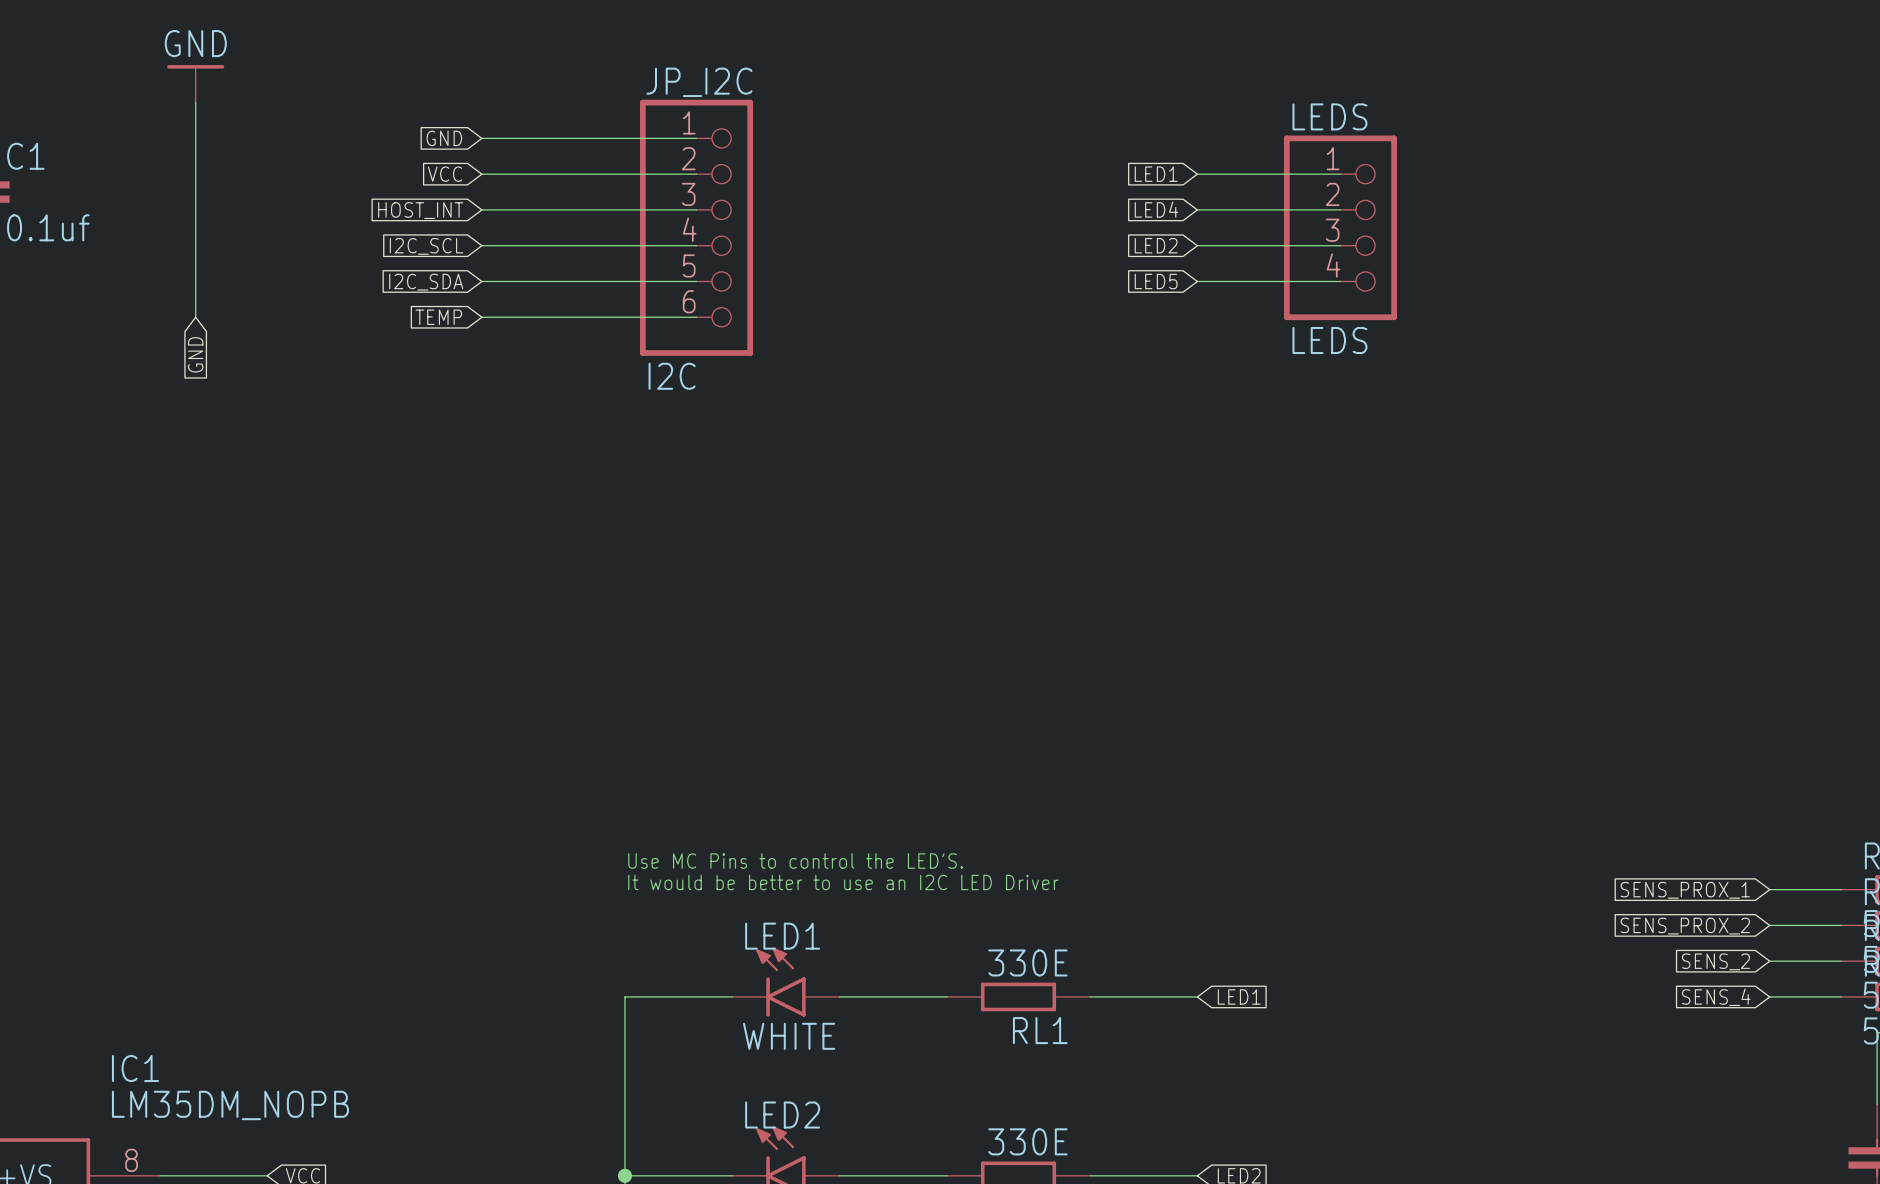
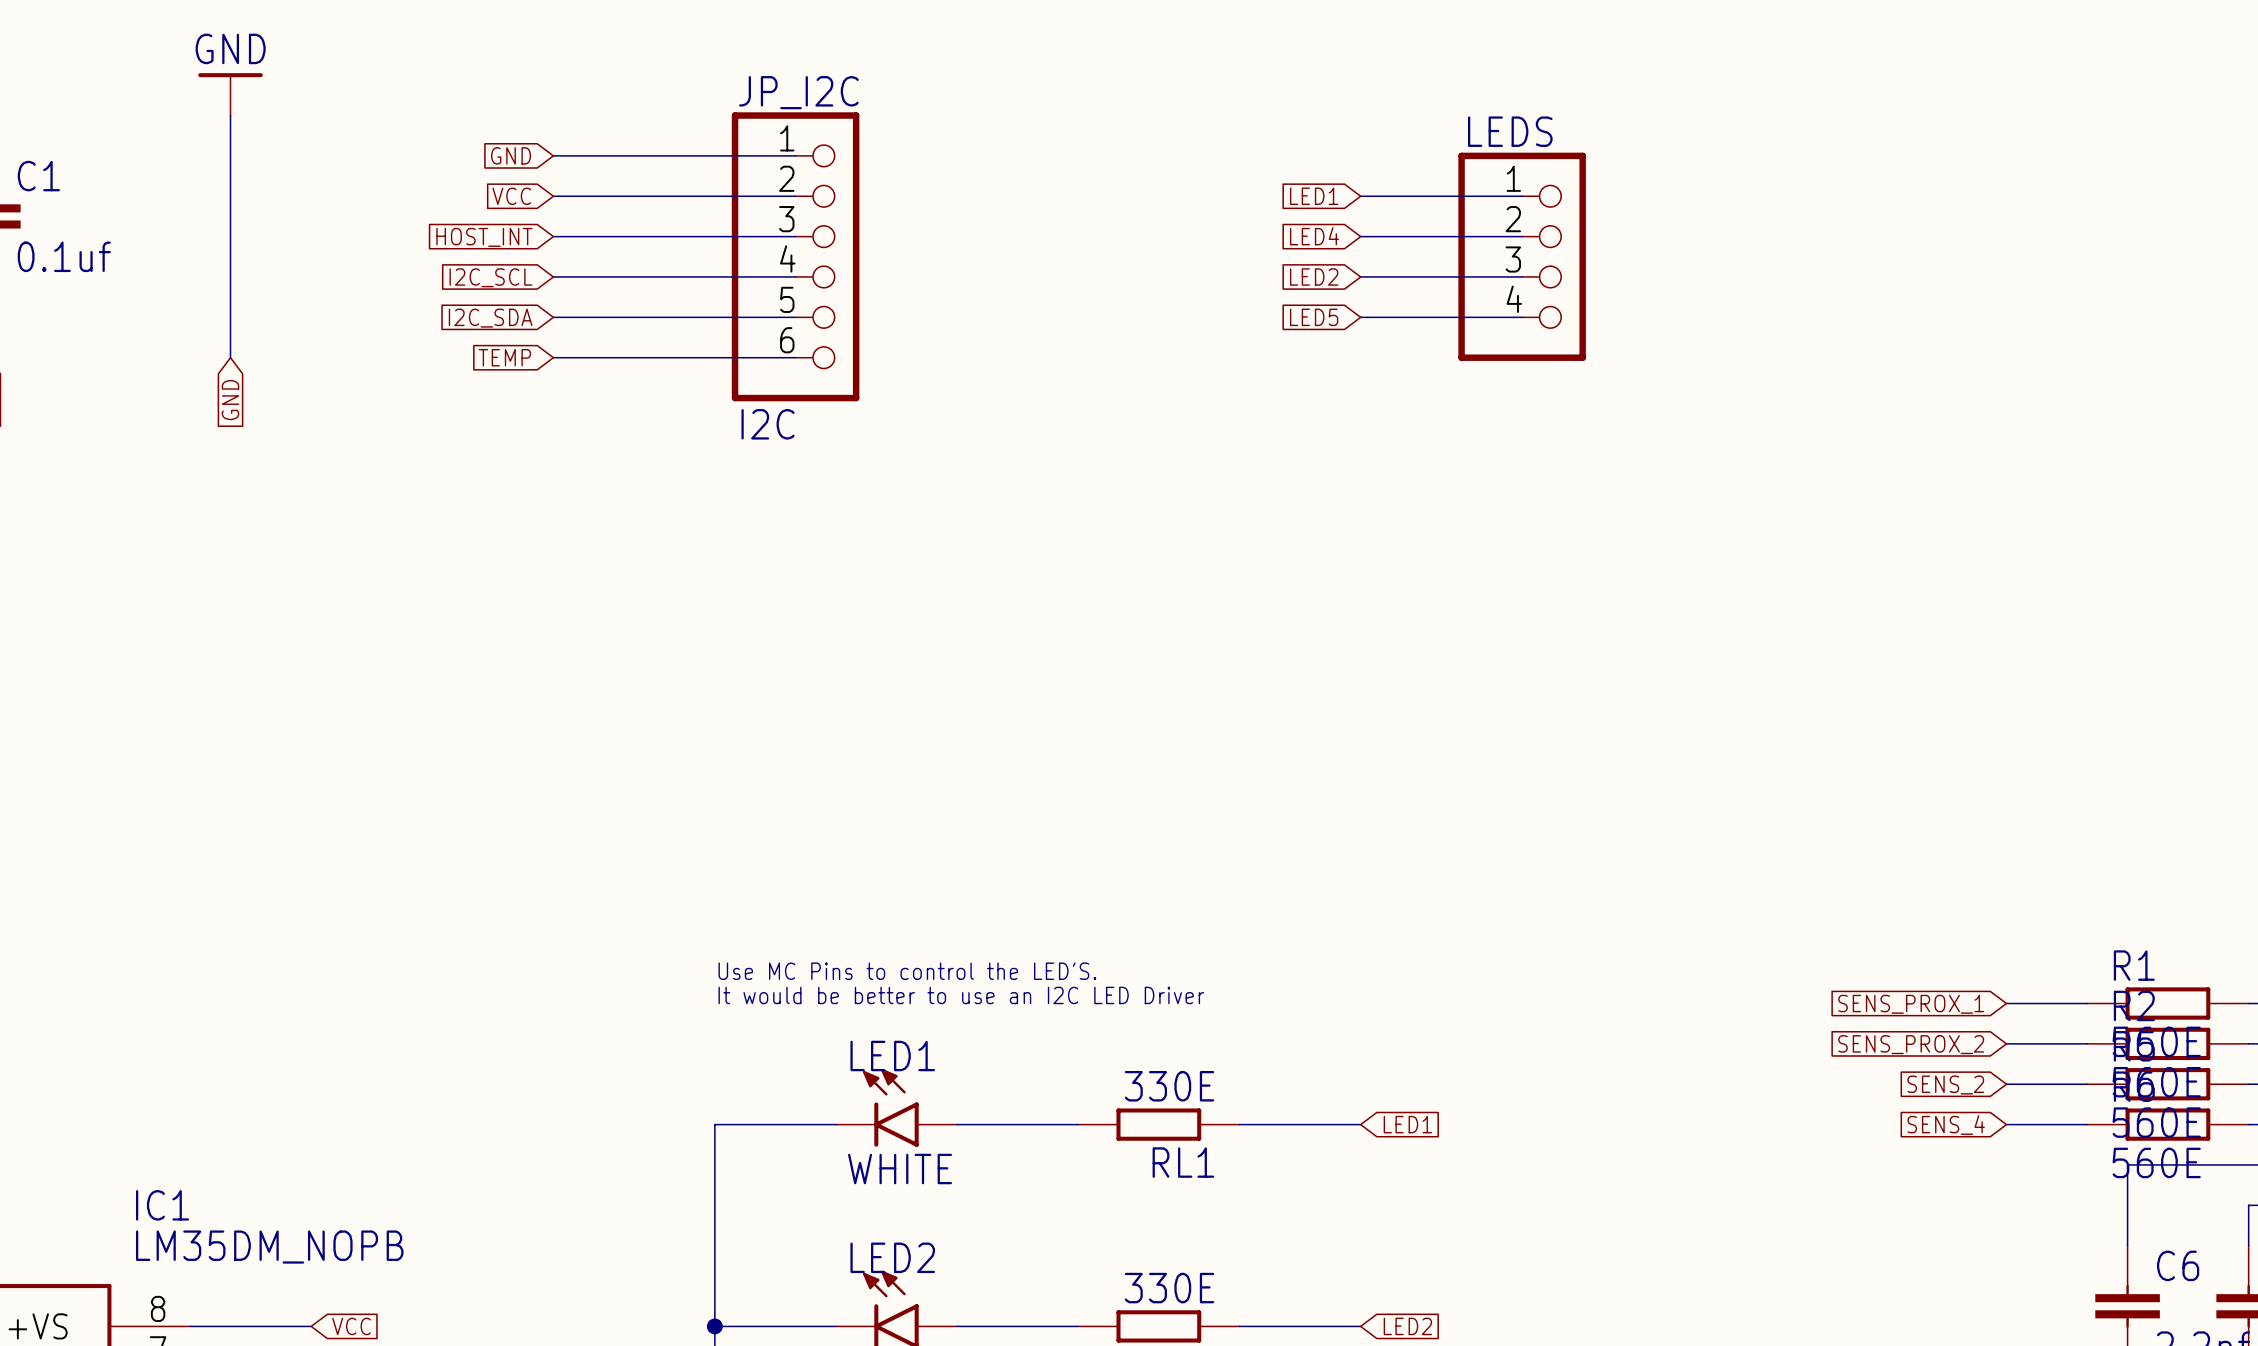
LEDS value: LEDS (1329, 340) -> none

